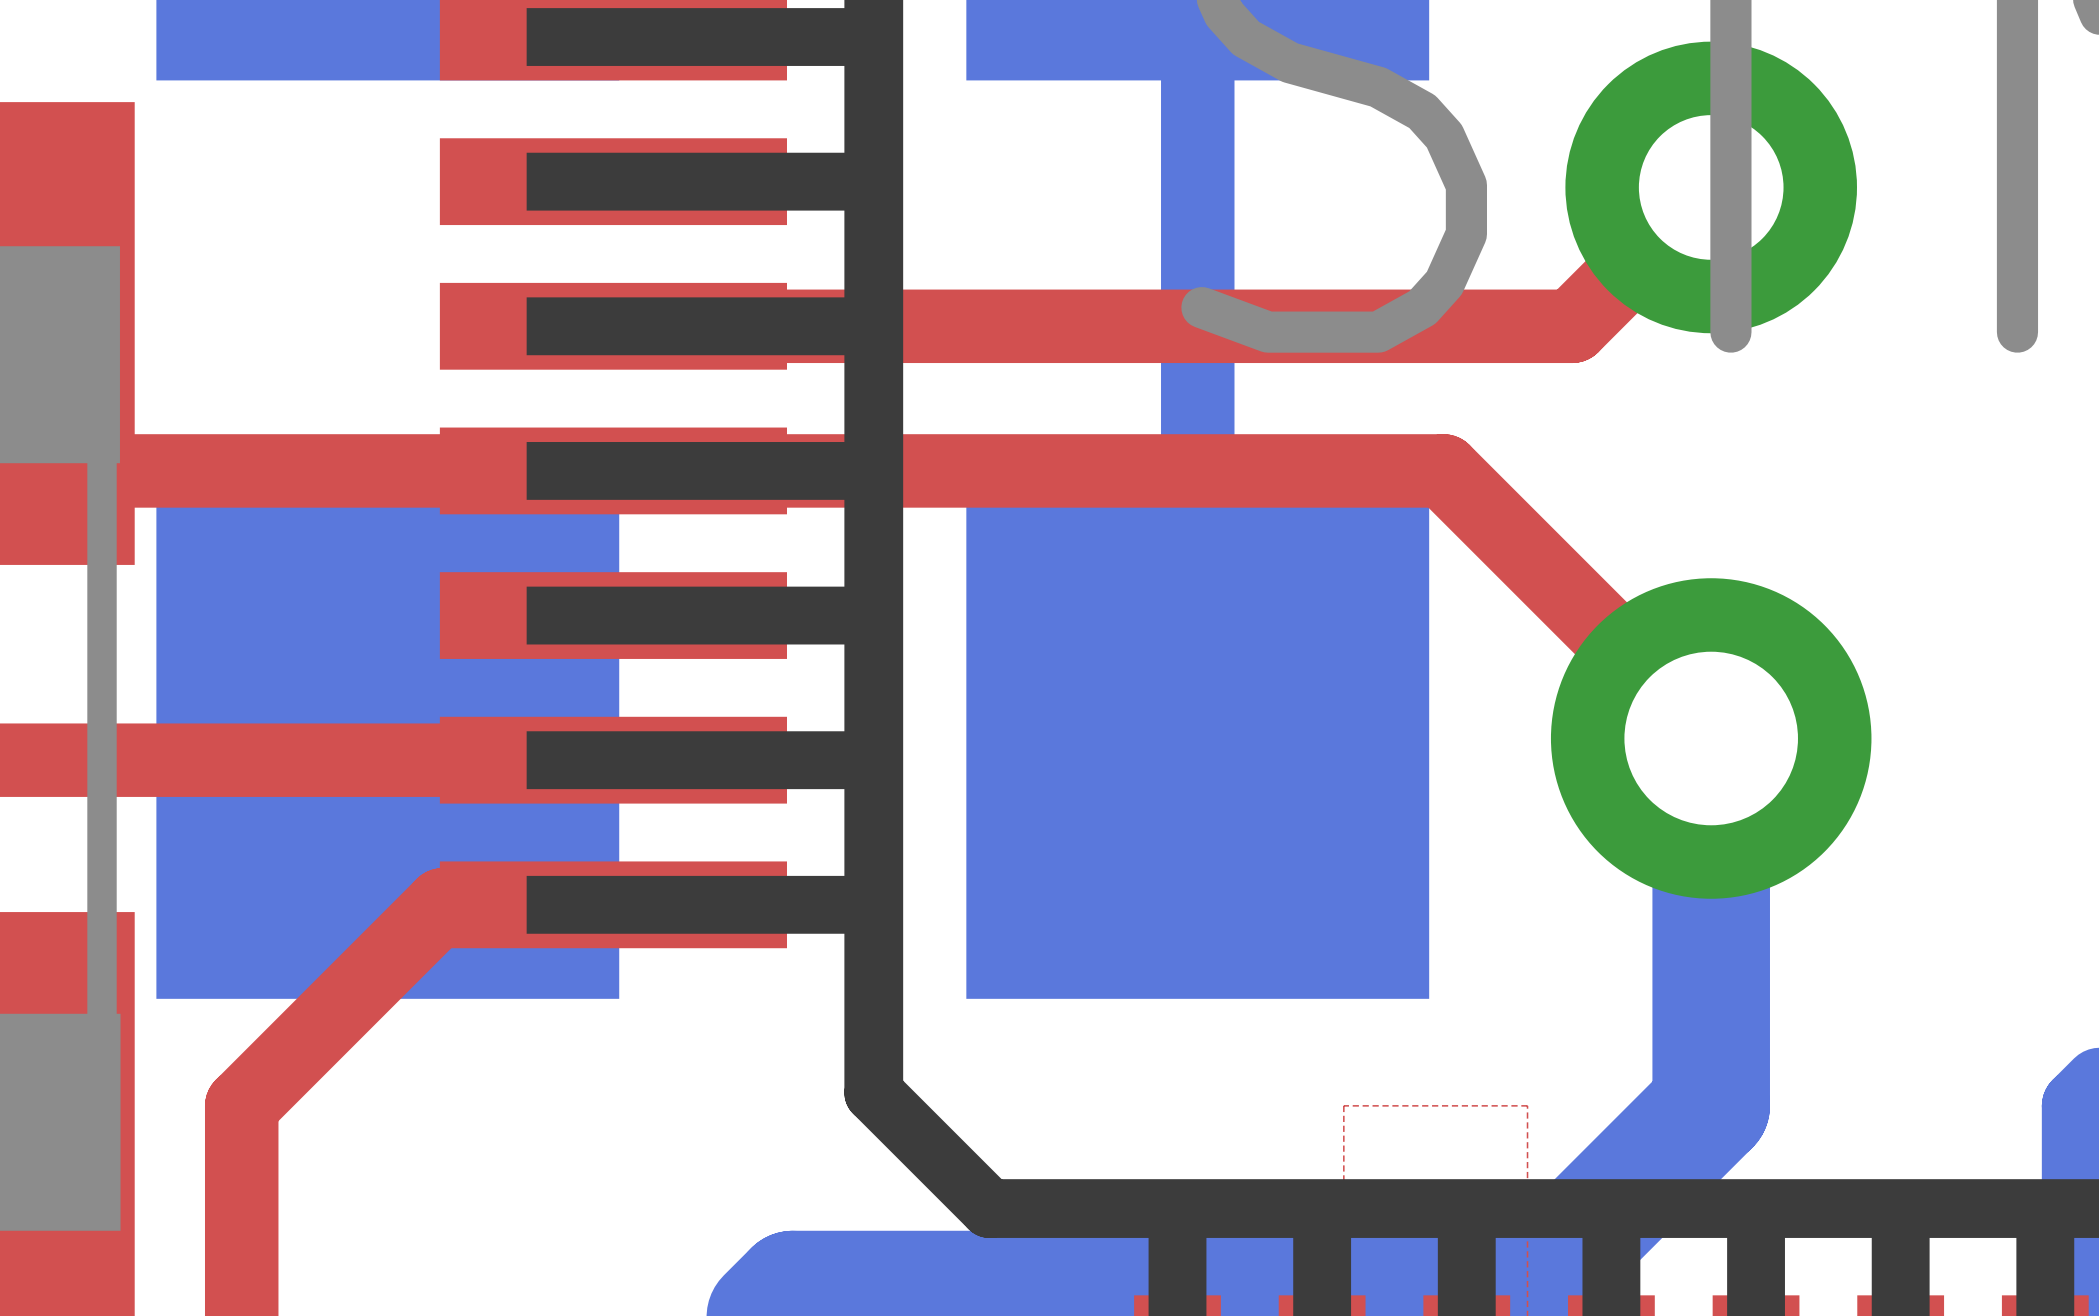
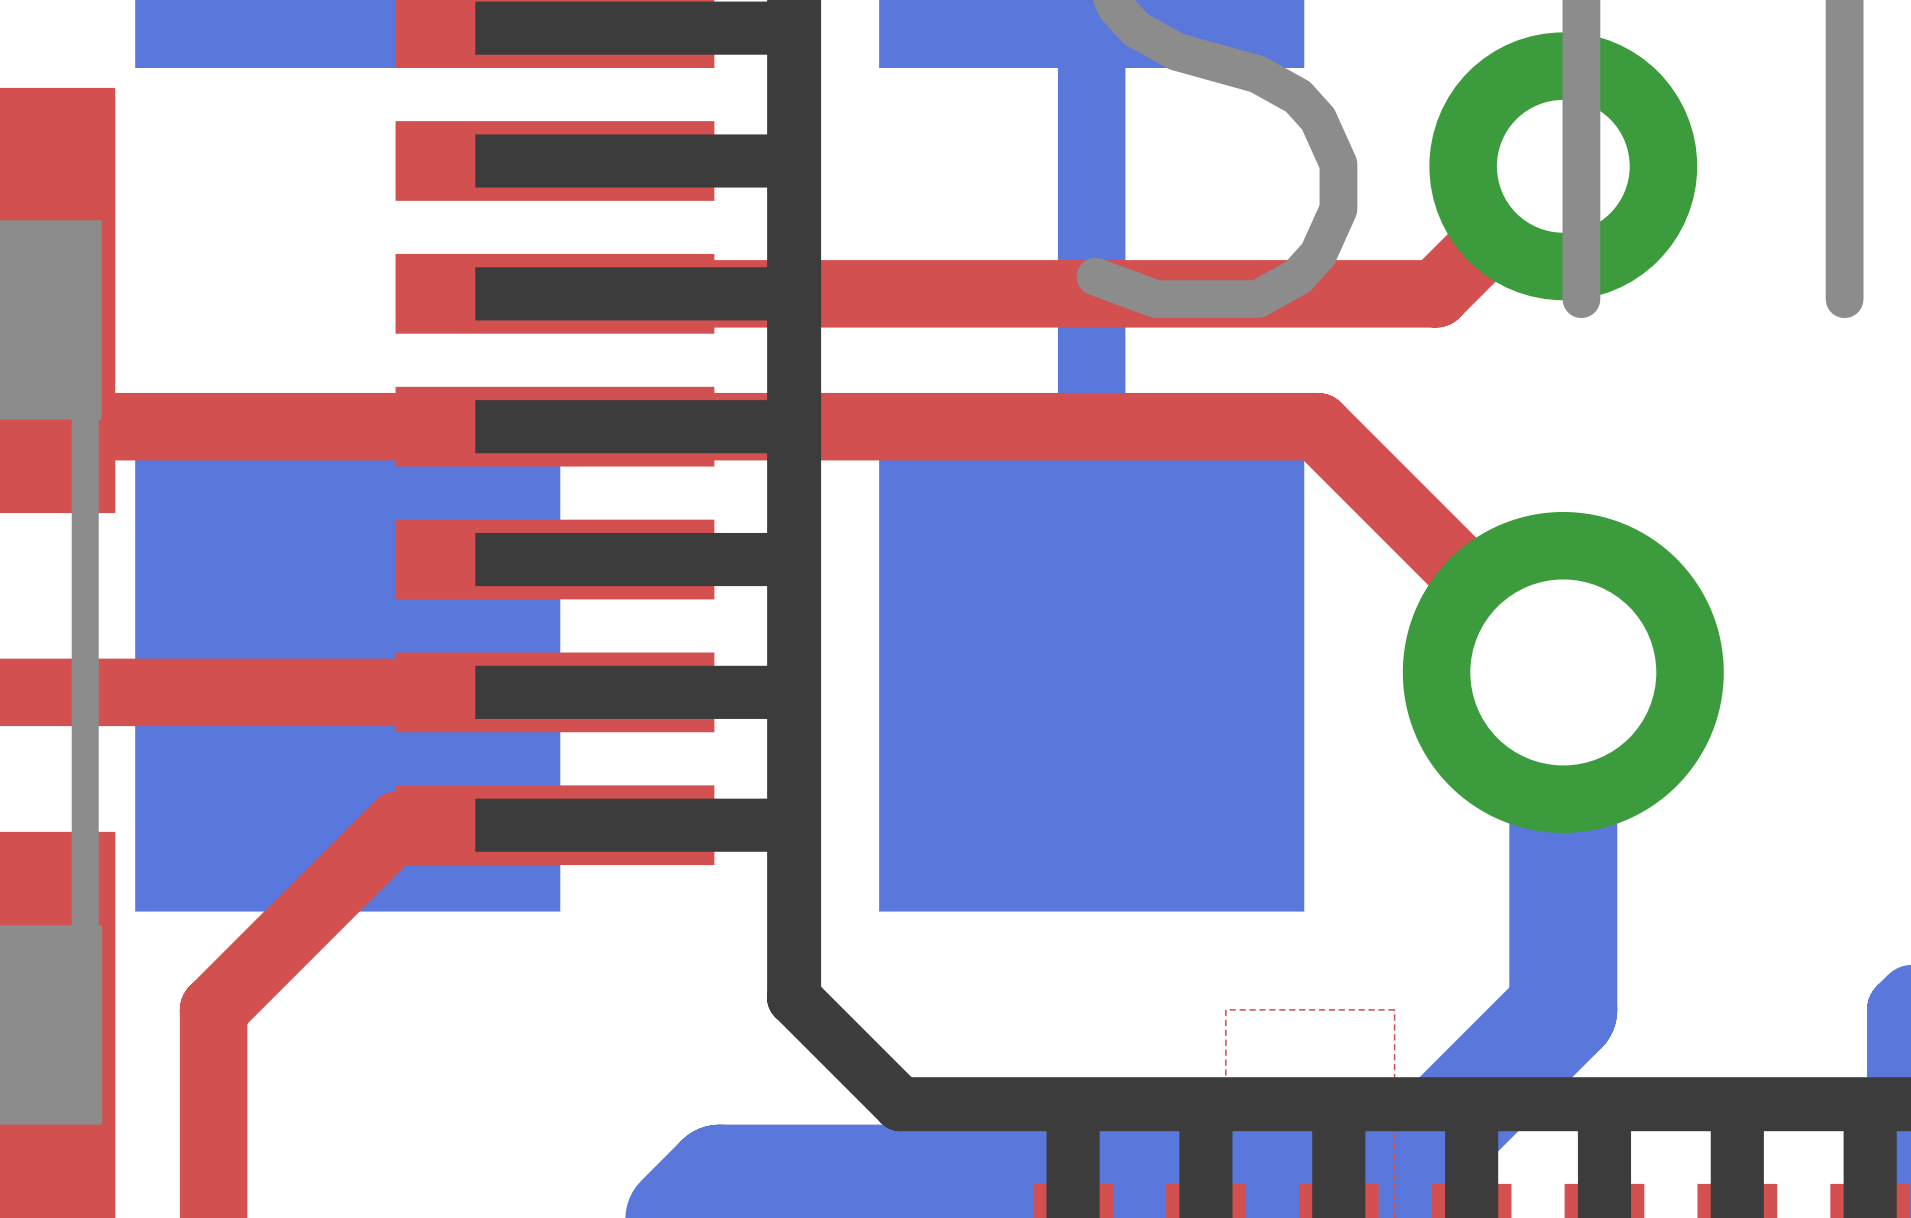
via size: [1550, 578, 1872, 899] -> [1402, 511, 1724, 833]

